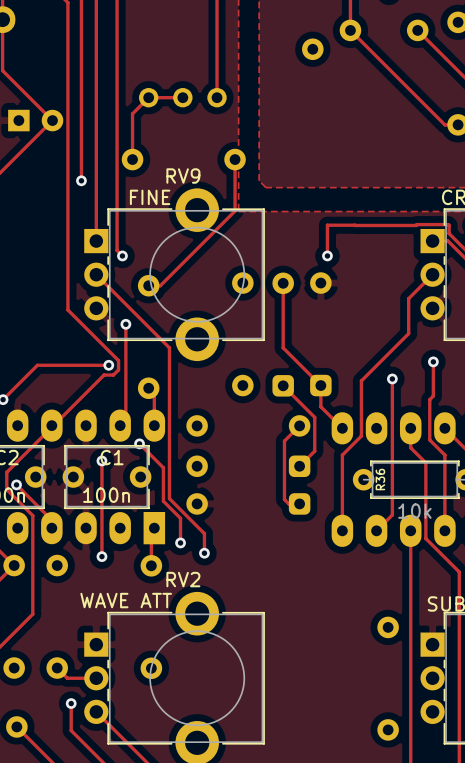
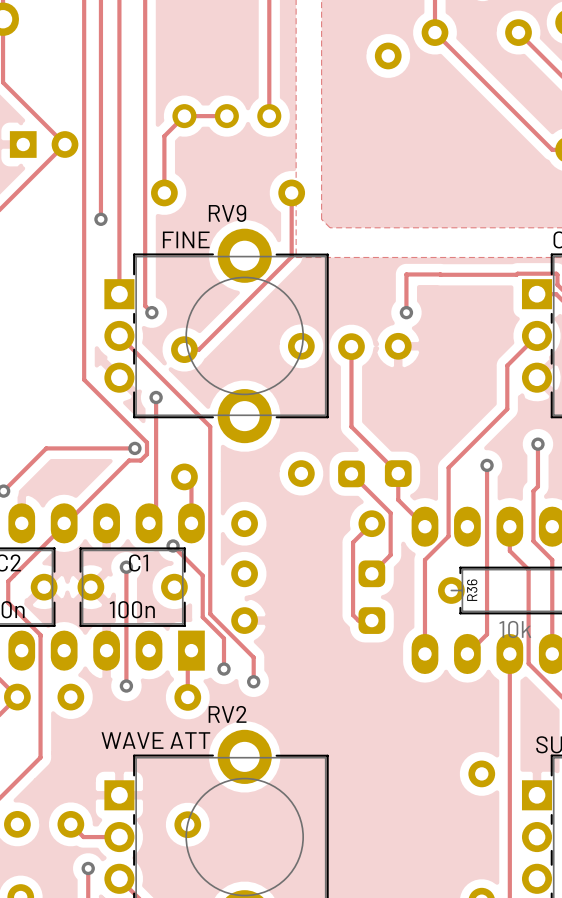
track: (16, 484) (51, 520) (51, 528) -> none
via: (16, 484) -> none

